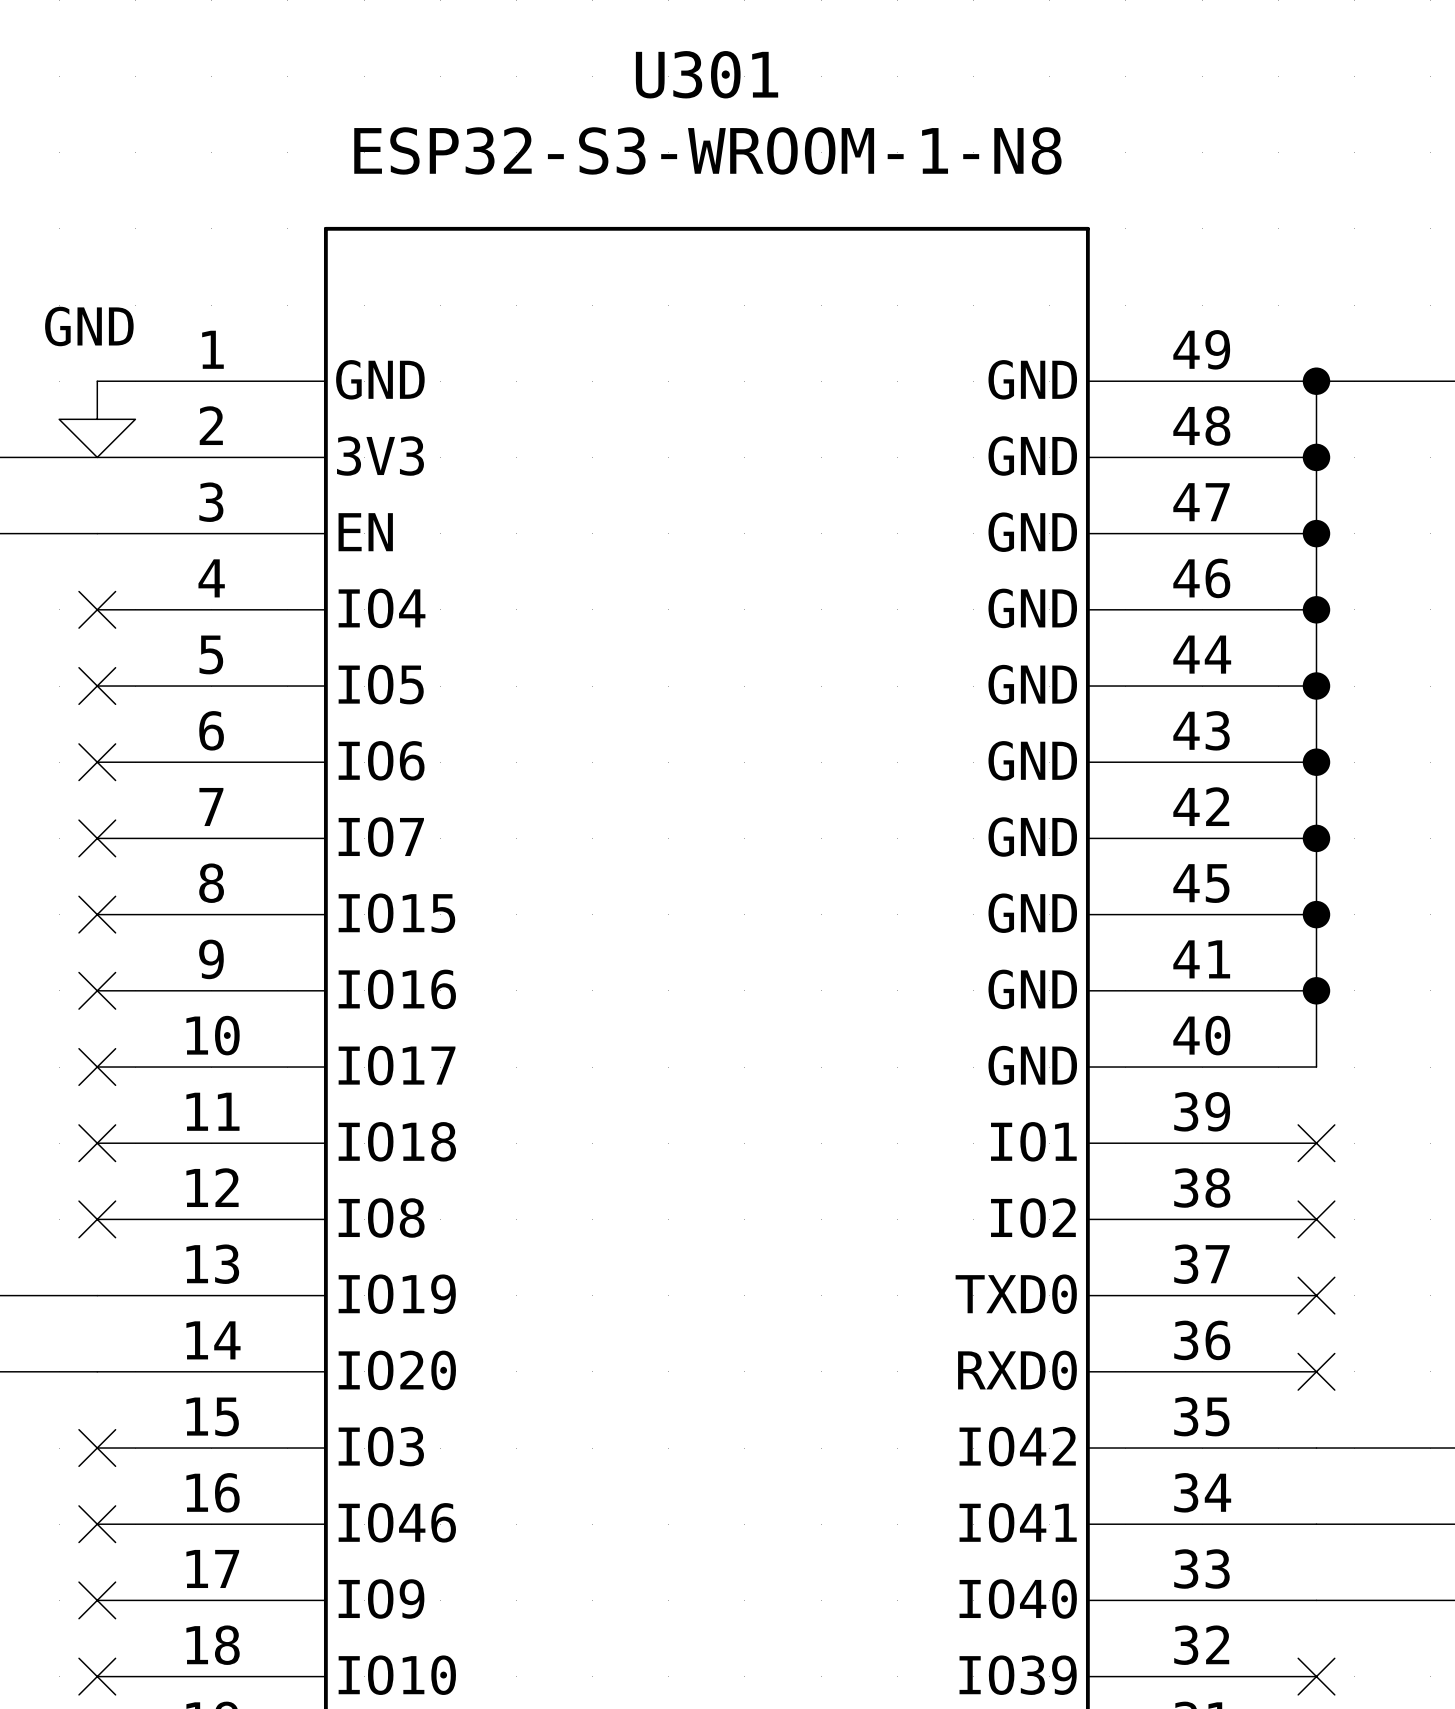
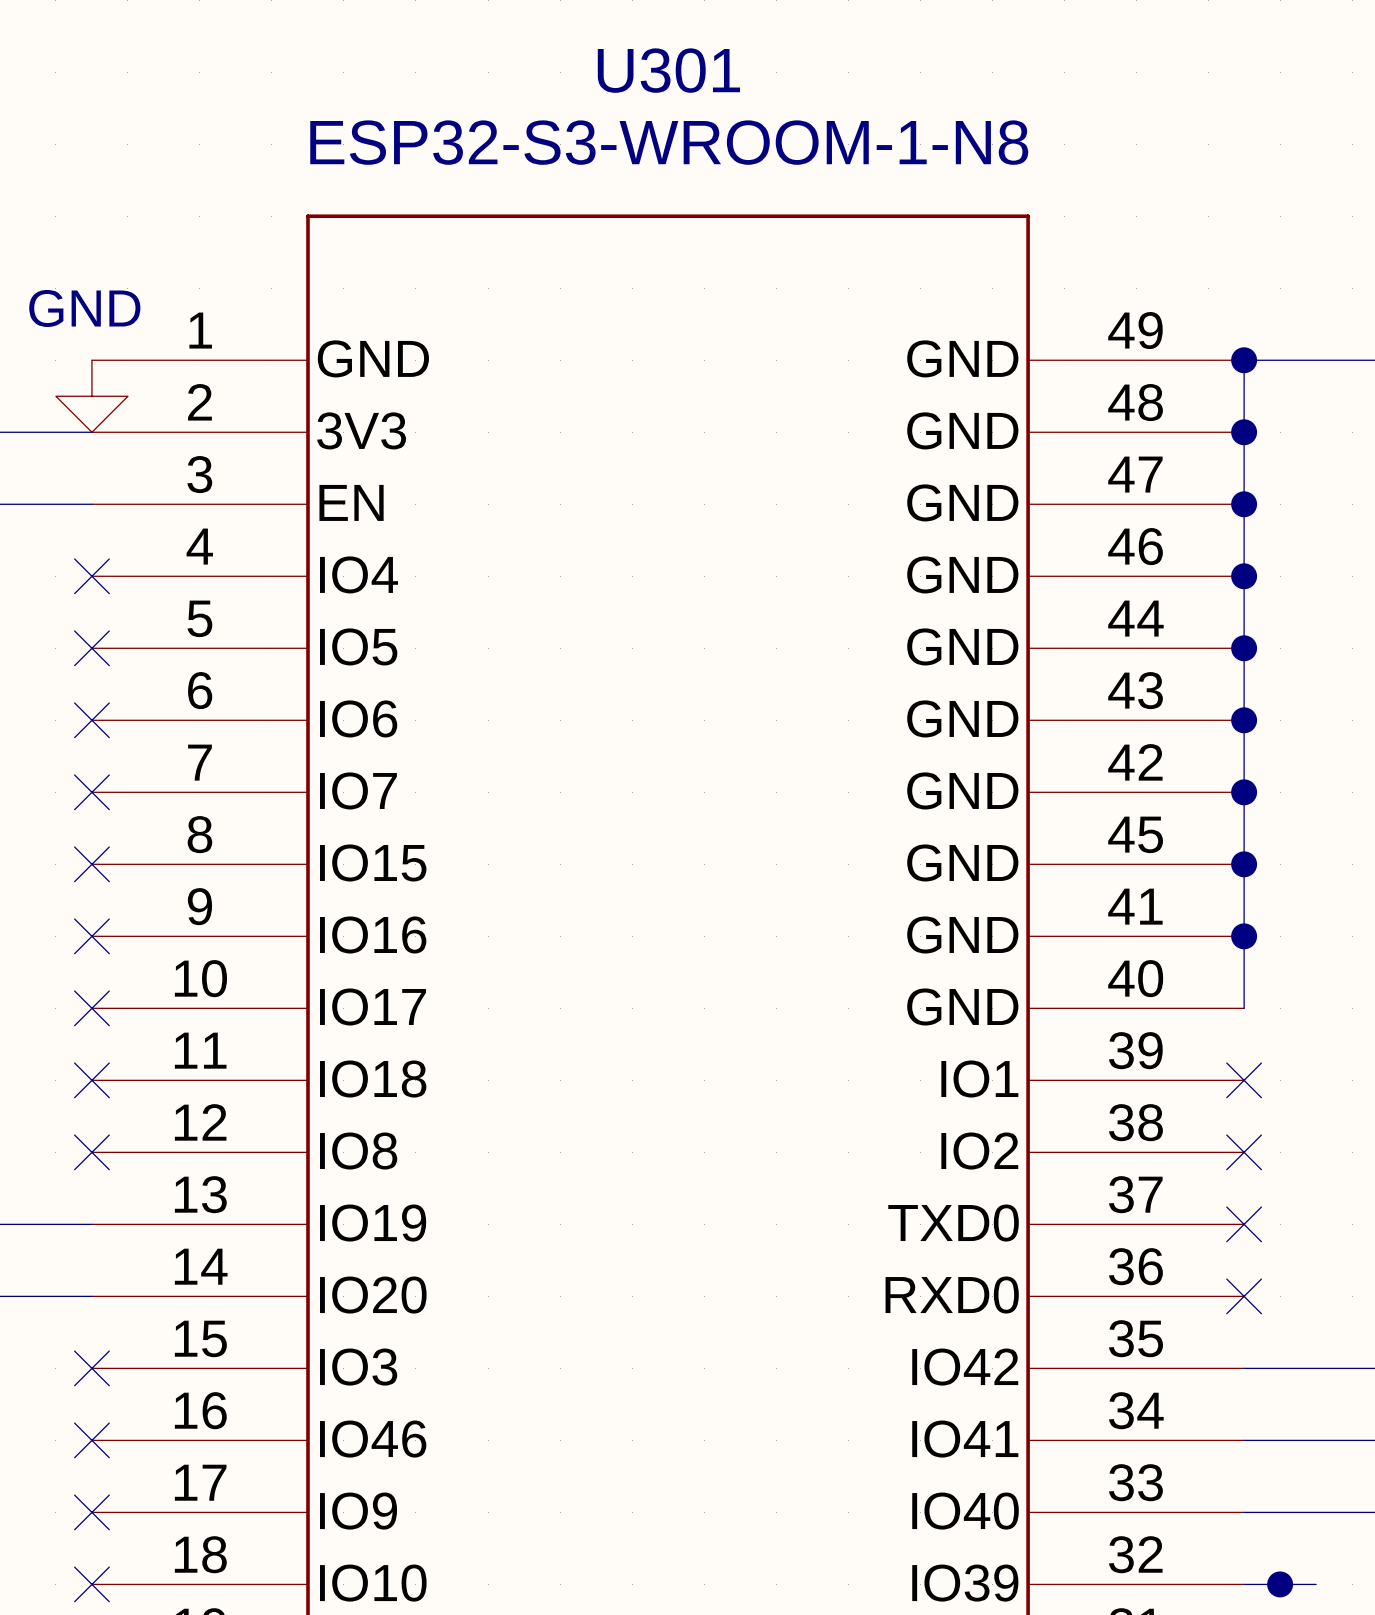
wire: none -> (1244, 1584) (1316, 1584)
no-connect mark: (1316, 1676) -> none
junction: none -> (1280, 1584)

